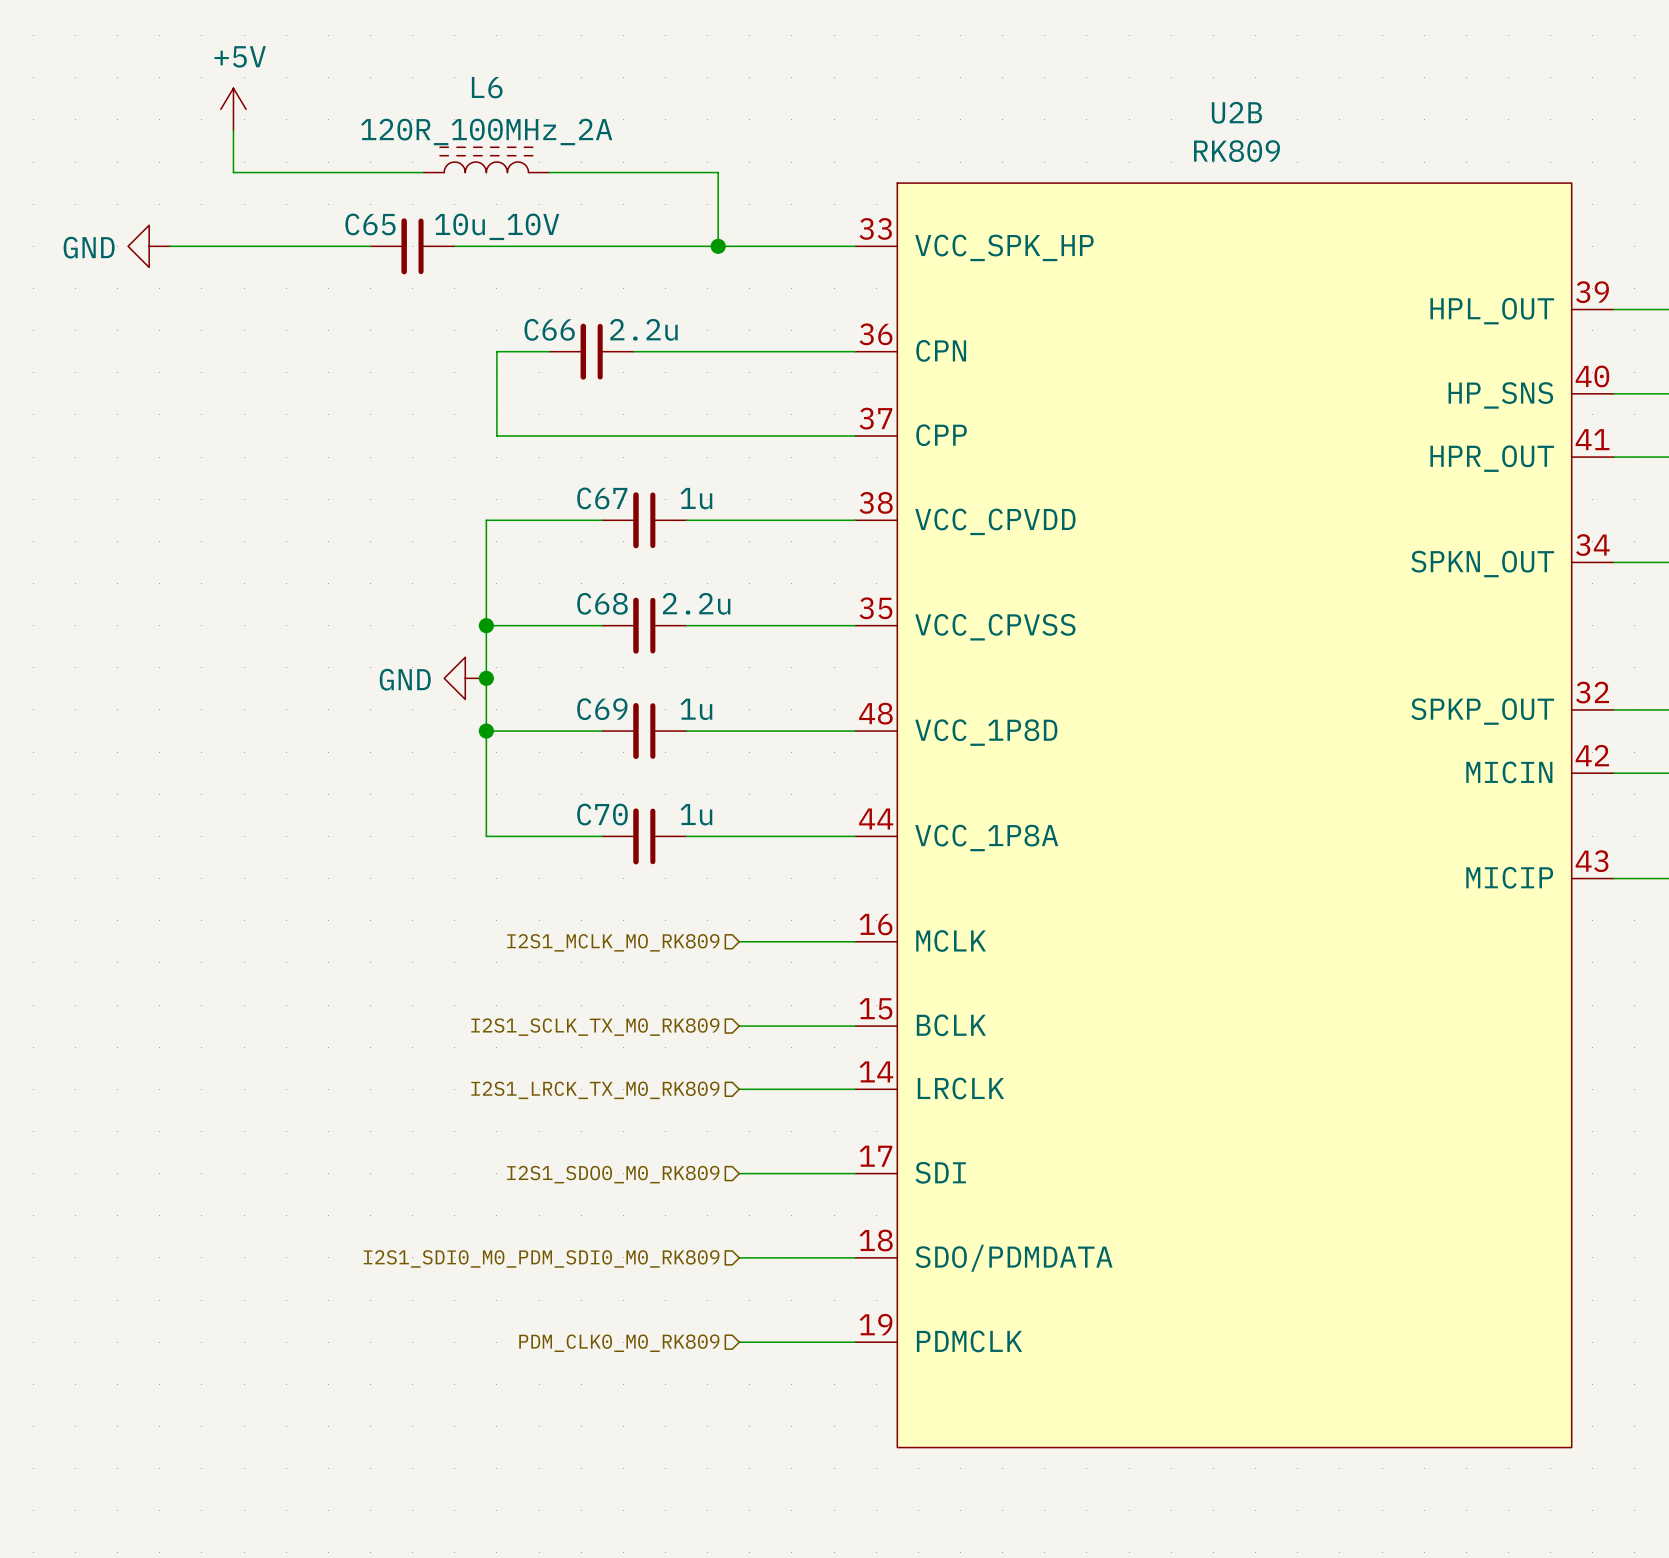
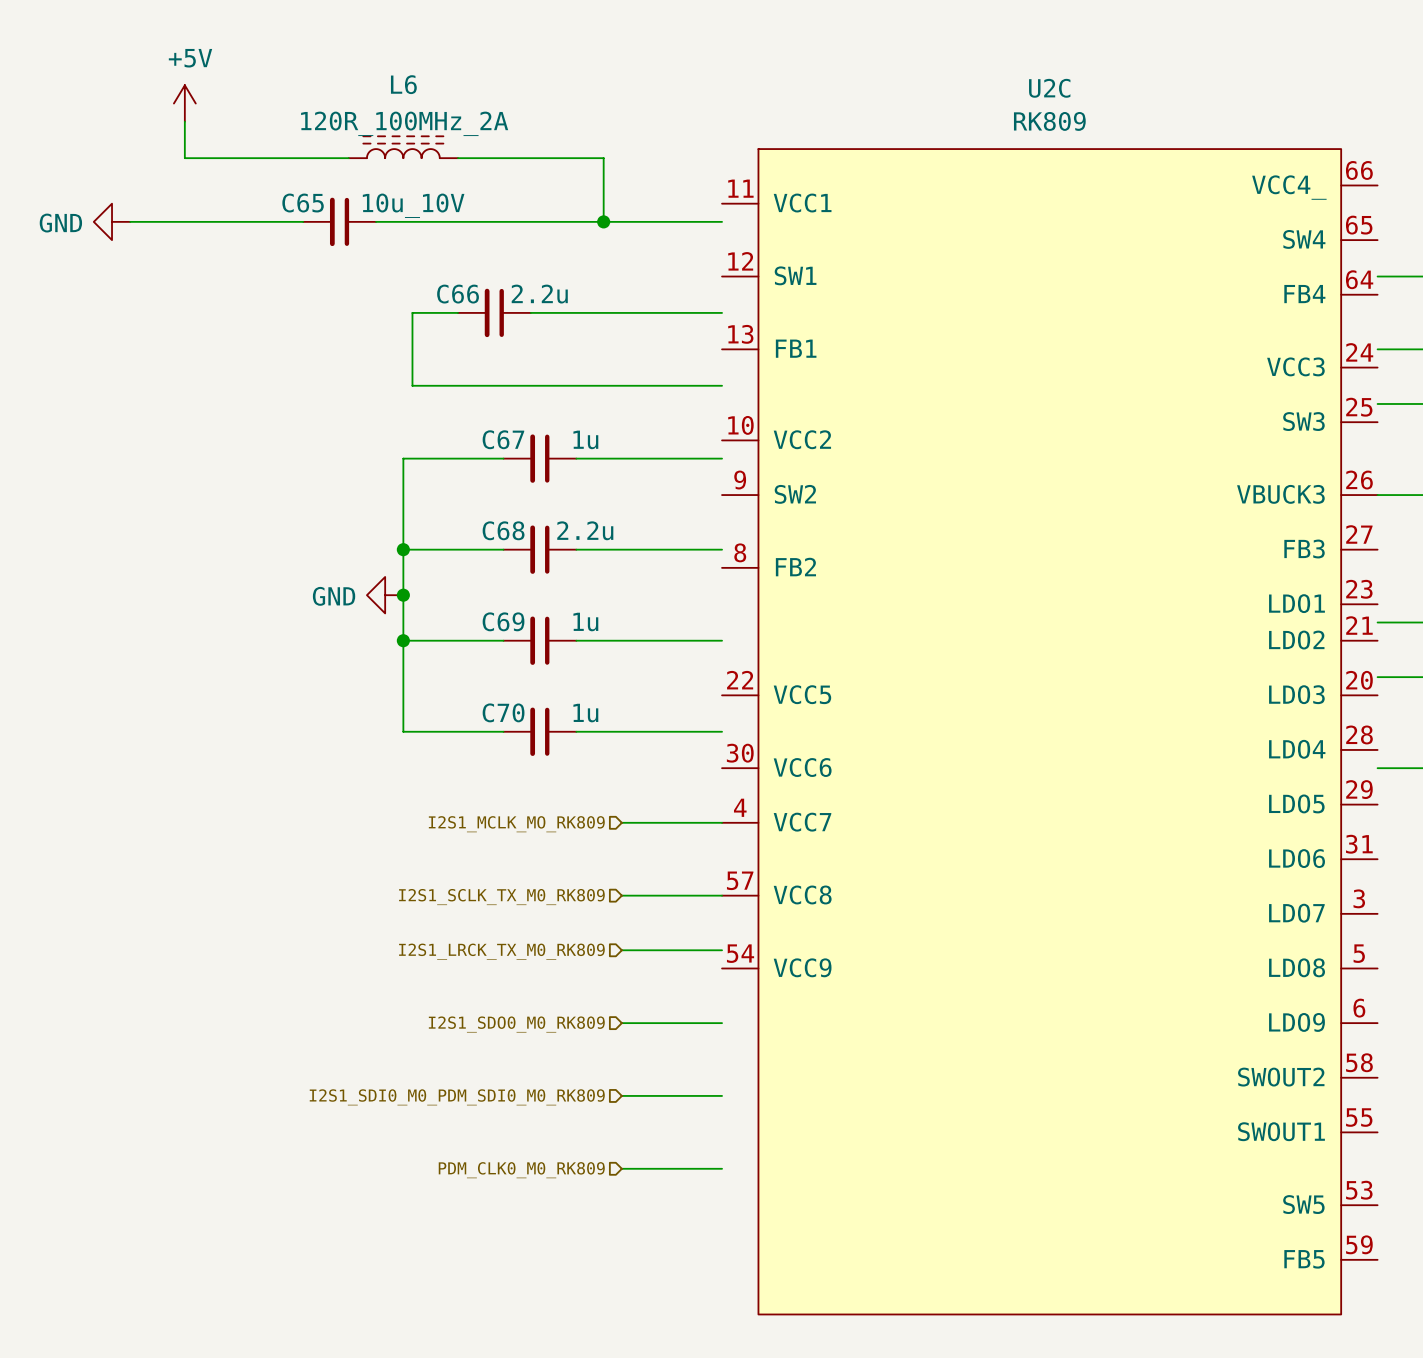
U2B: RK809 (1234, 815) -> none
U2C: none -> RK809 (1049, 731)

